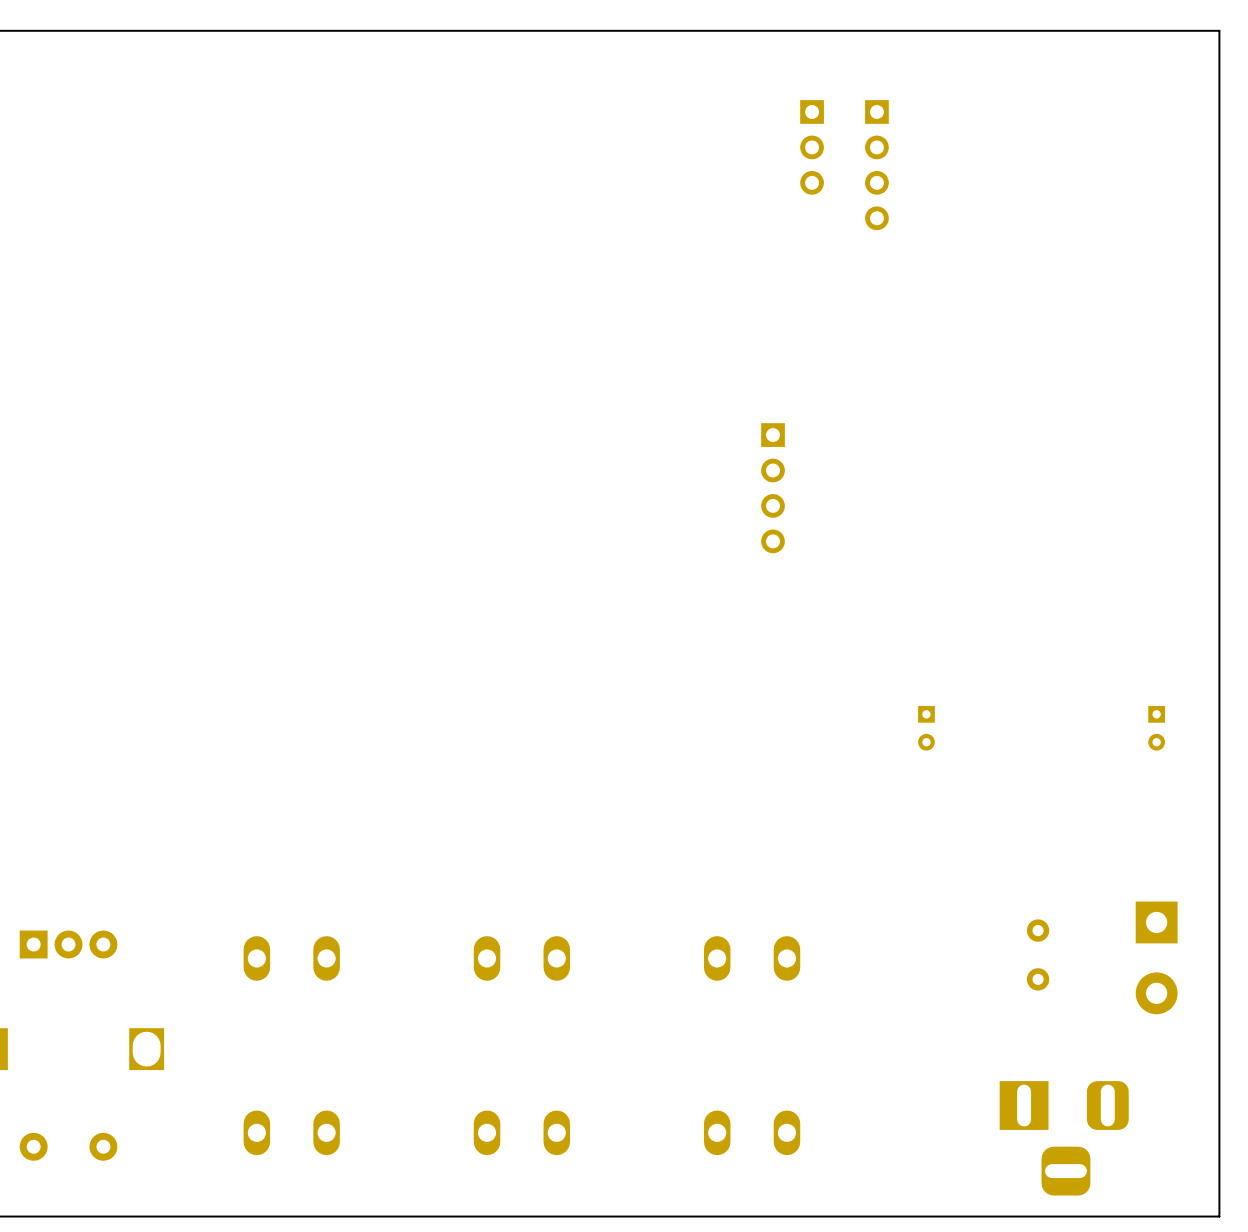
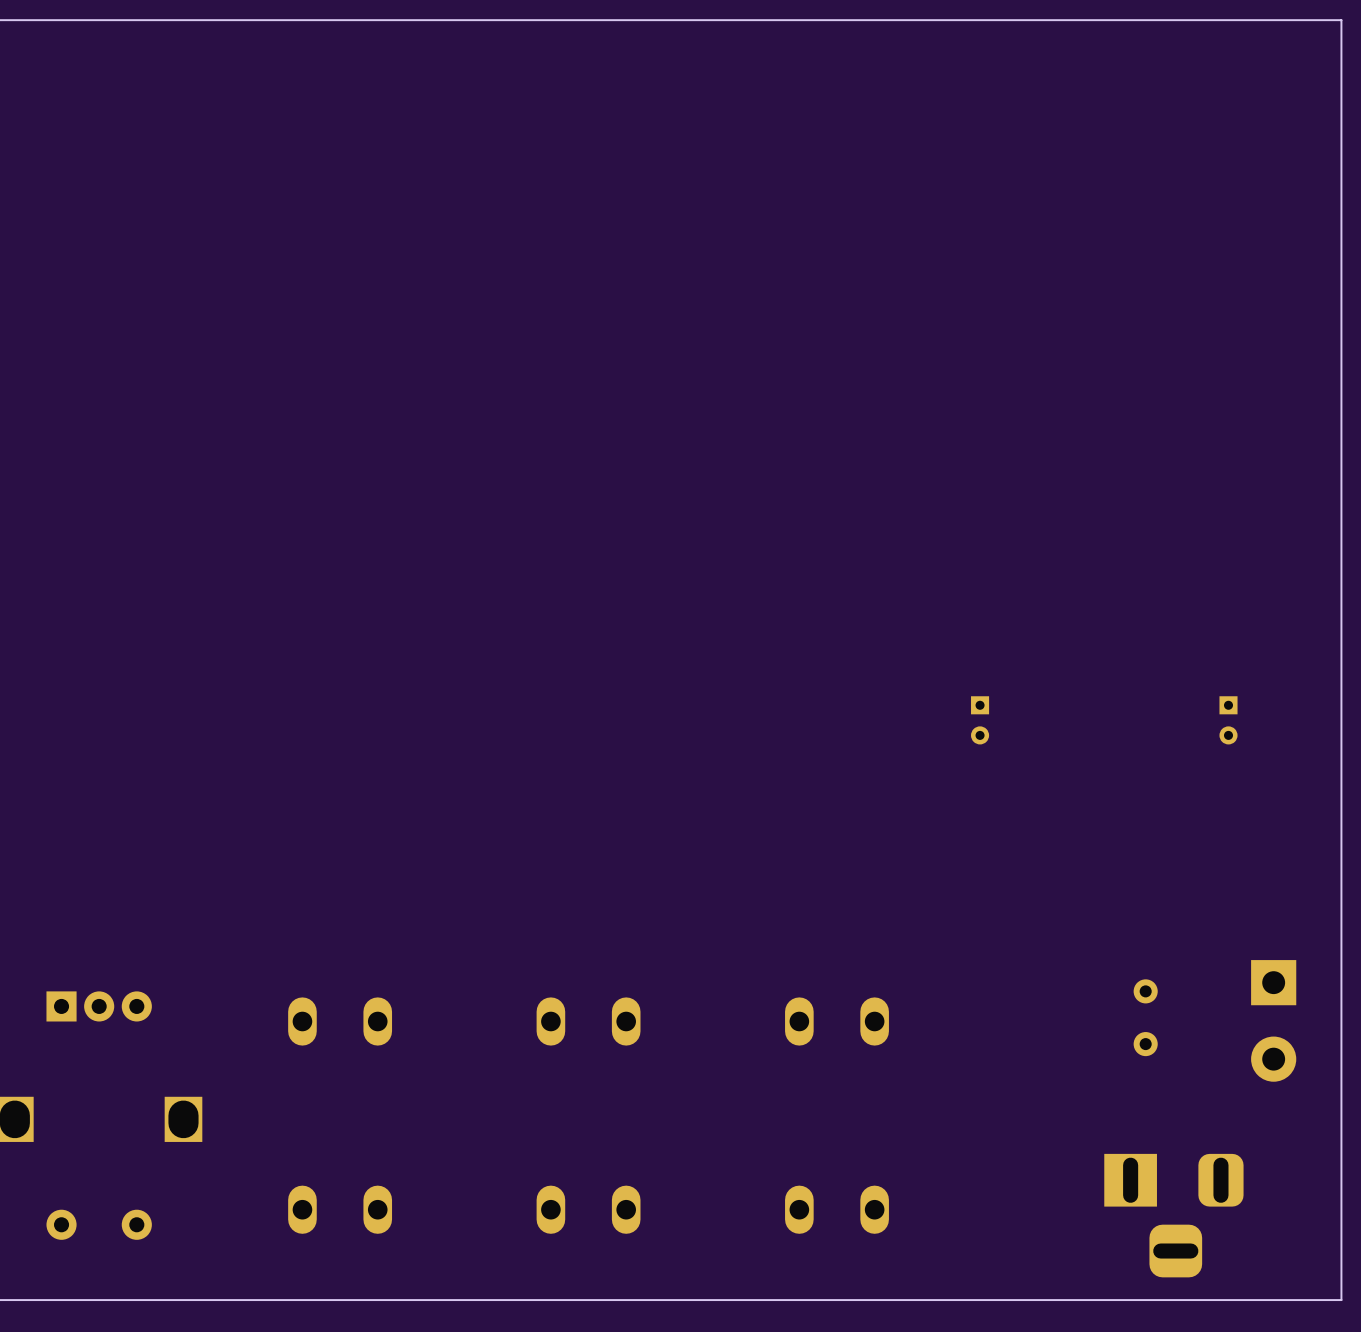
part: (812, 147) -> none
part: (876, 165) -> none
part: (773, 488) -> none
part position: (926, 728) -> (980, 720)
part position: (1156, 728) -> (1228, 720)

